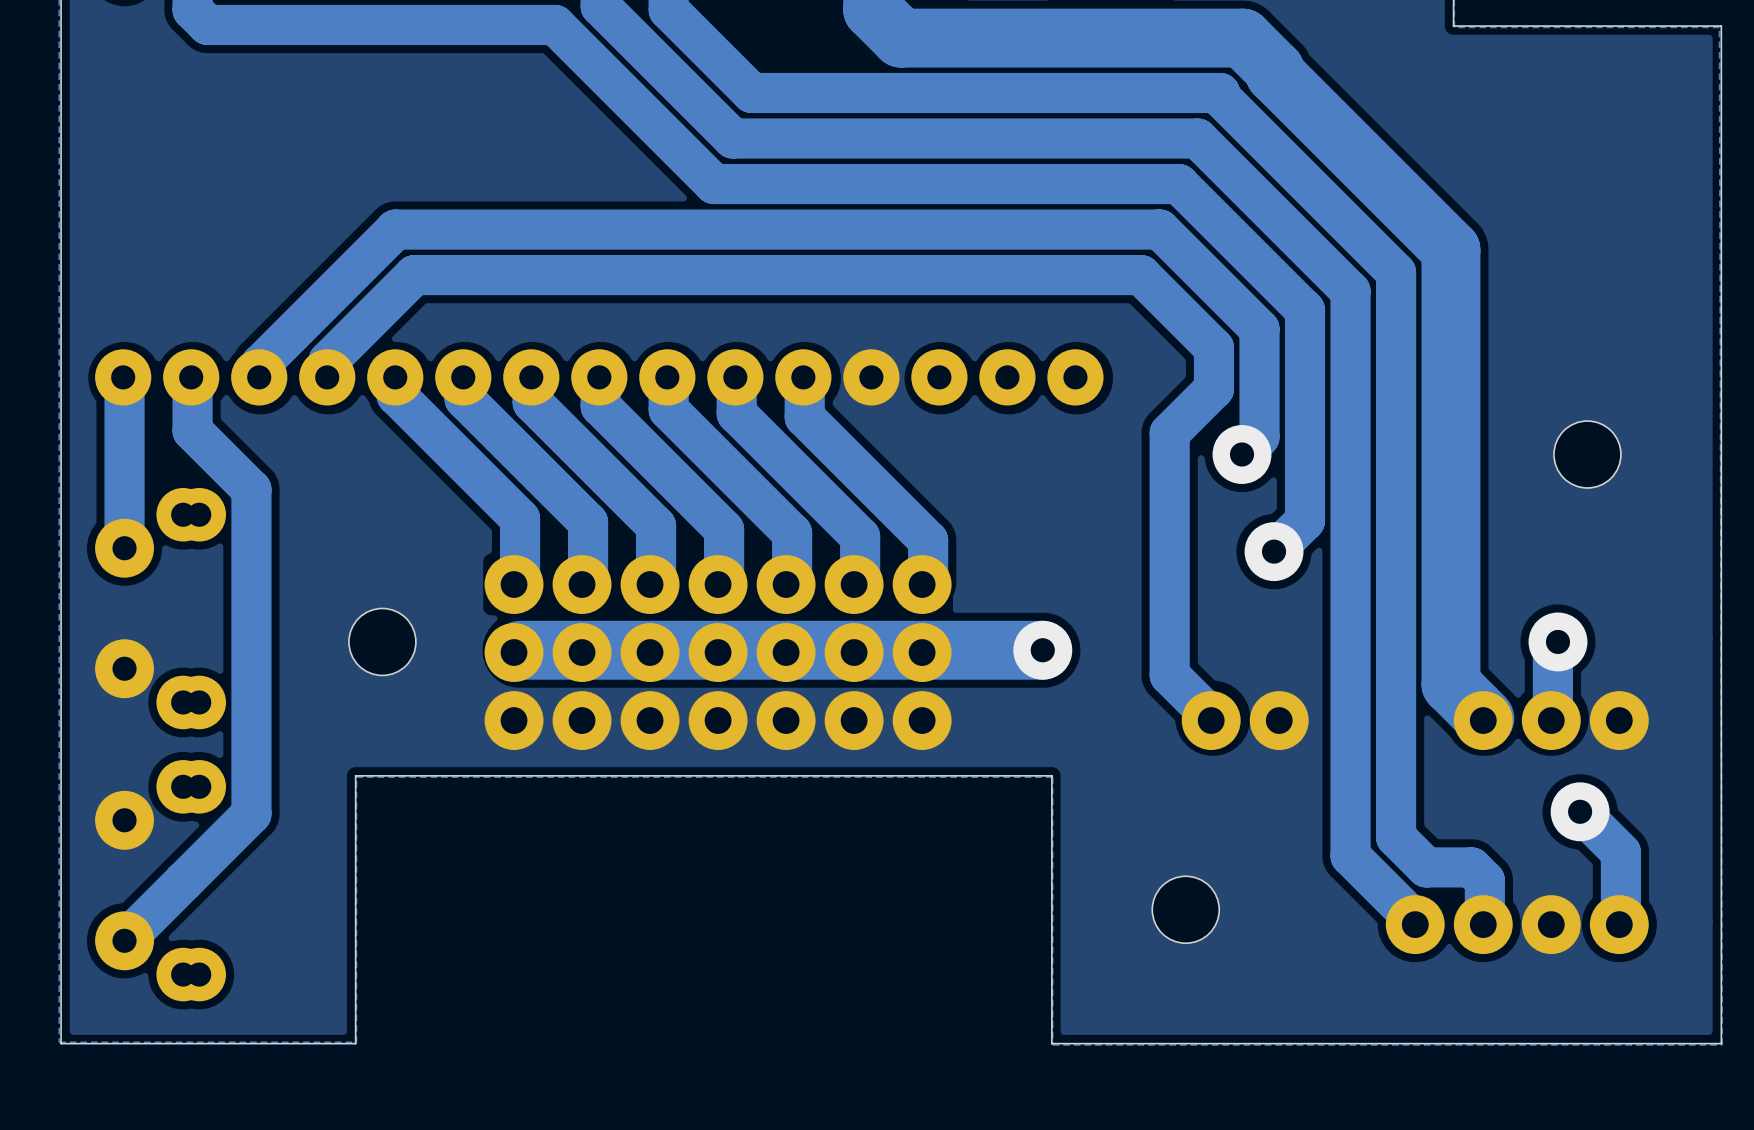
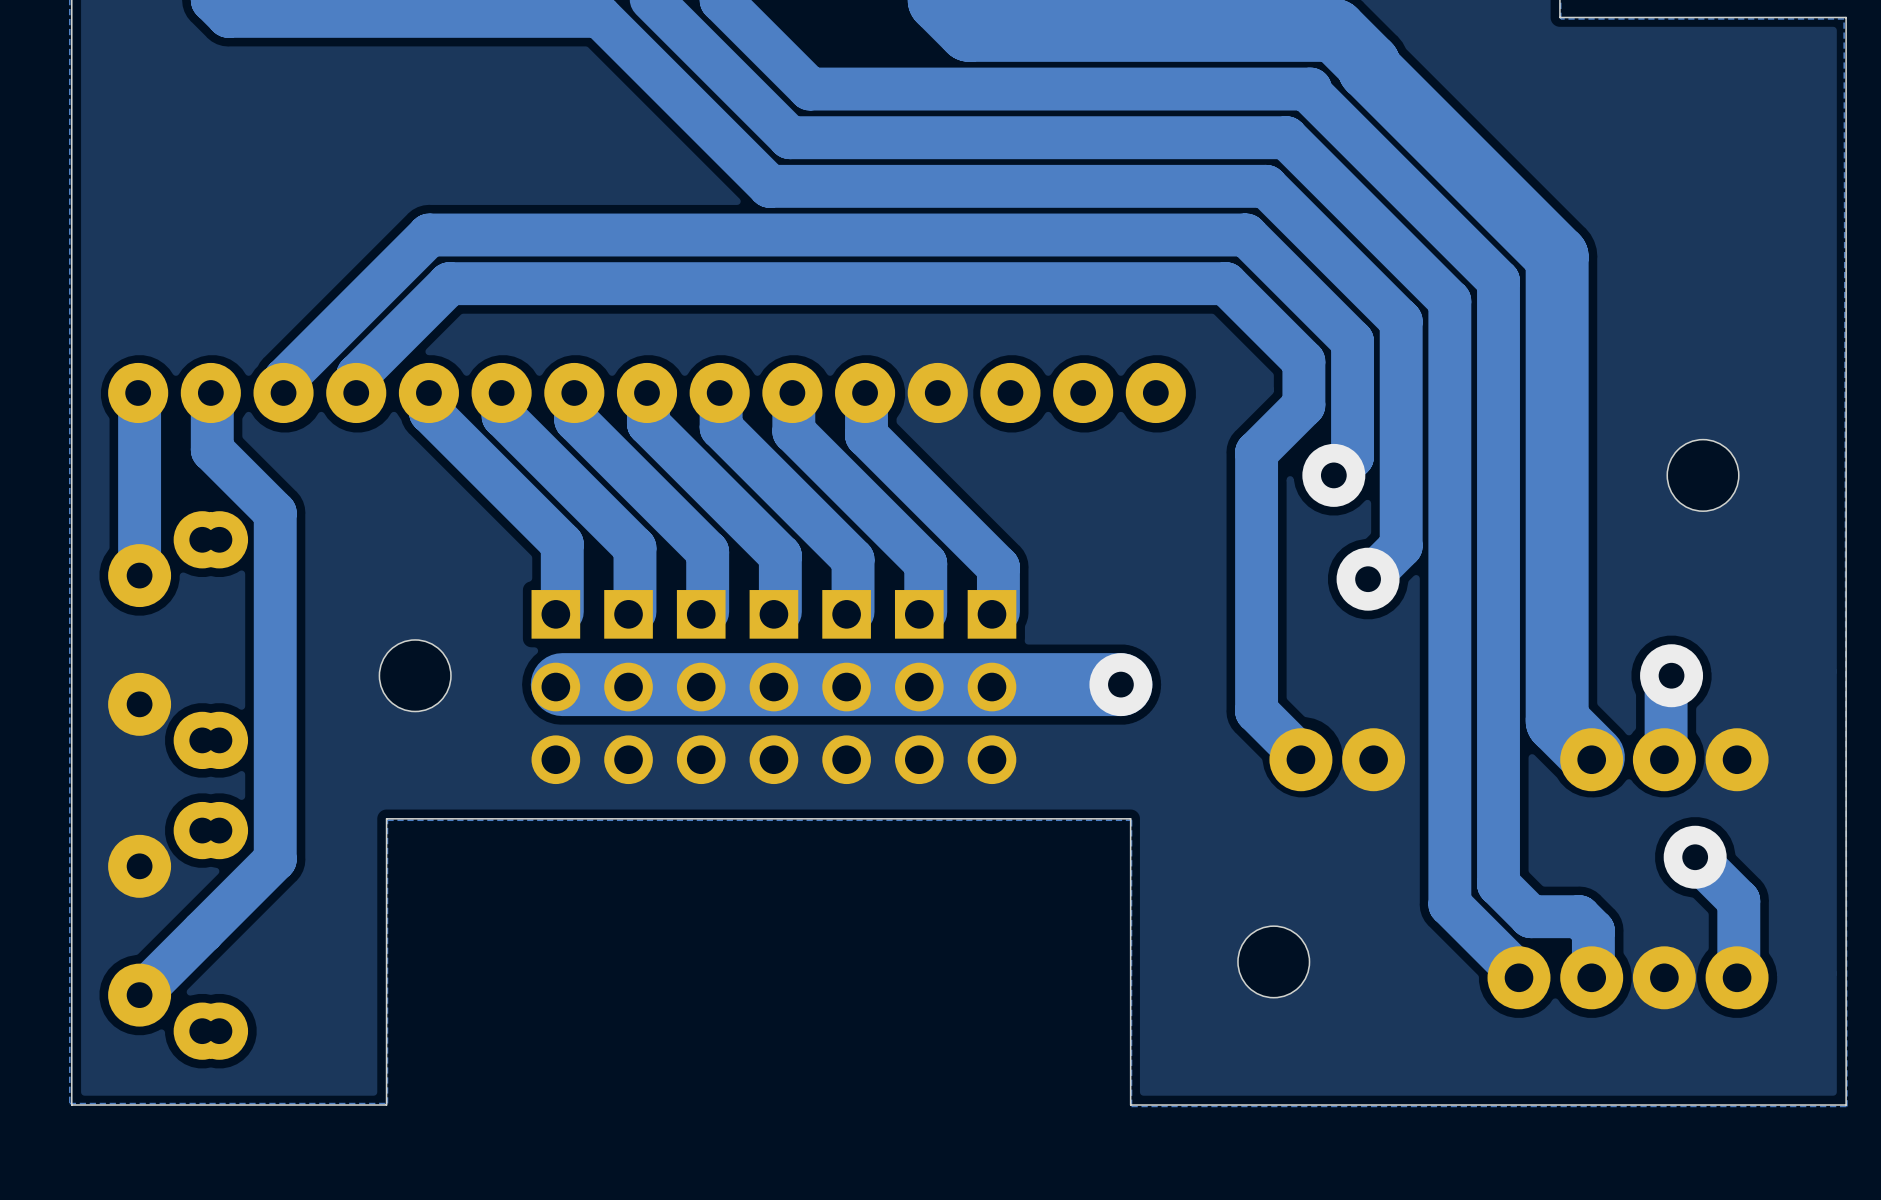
part footprint: [484, 555, 544, 751] -> [531, 590, 581, 785]
part footprint: [552, 555, 612, 751] -> [604, 590, 653, 785]
part footprint: [620, 555, 680, 751] -> [676, 590, 726, 785]
part footprint: [688, 555, 748, 751] -> [749, 590, 799, 785]
part footprint: [756, 555, 816, 751] -> [822, 590, 871, 785]
part footprint: [824, 555, 884, 751] -> [894, 590, 944, 785]
part footprint: [892, 555, 952, 751] -> [967, 590, 1017, 785]

